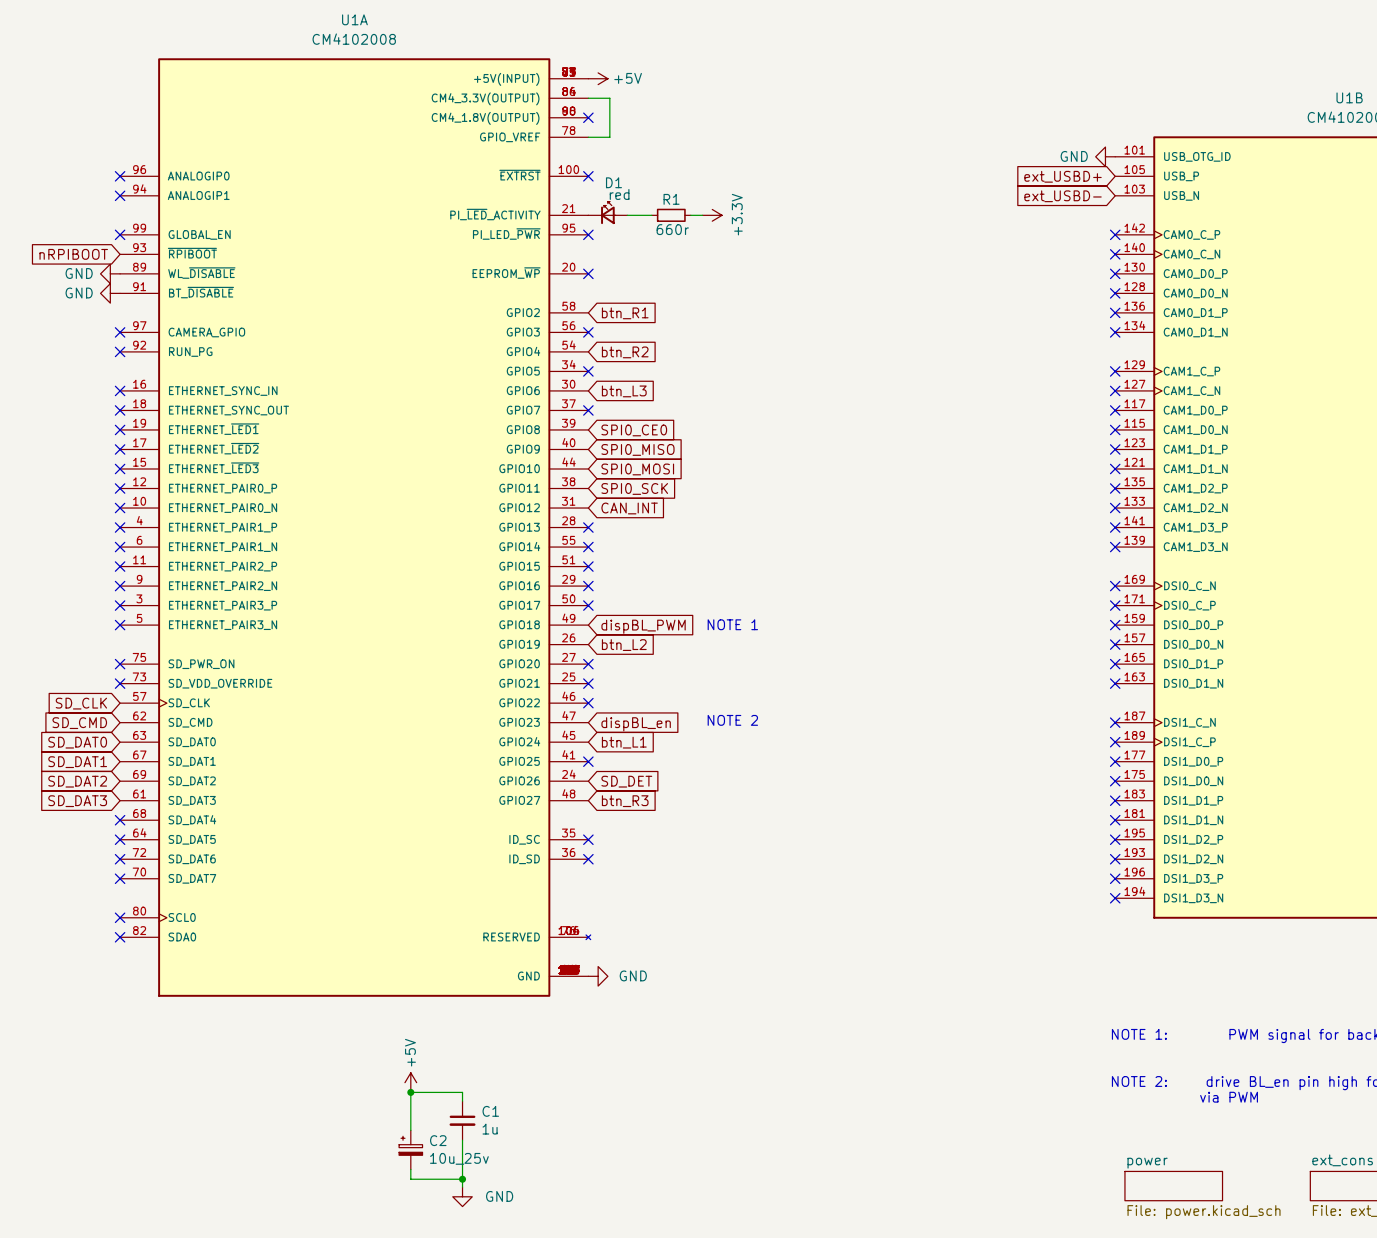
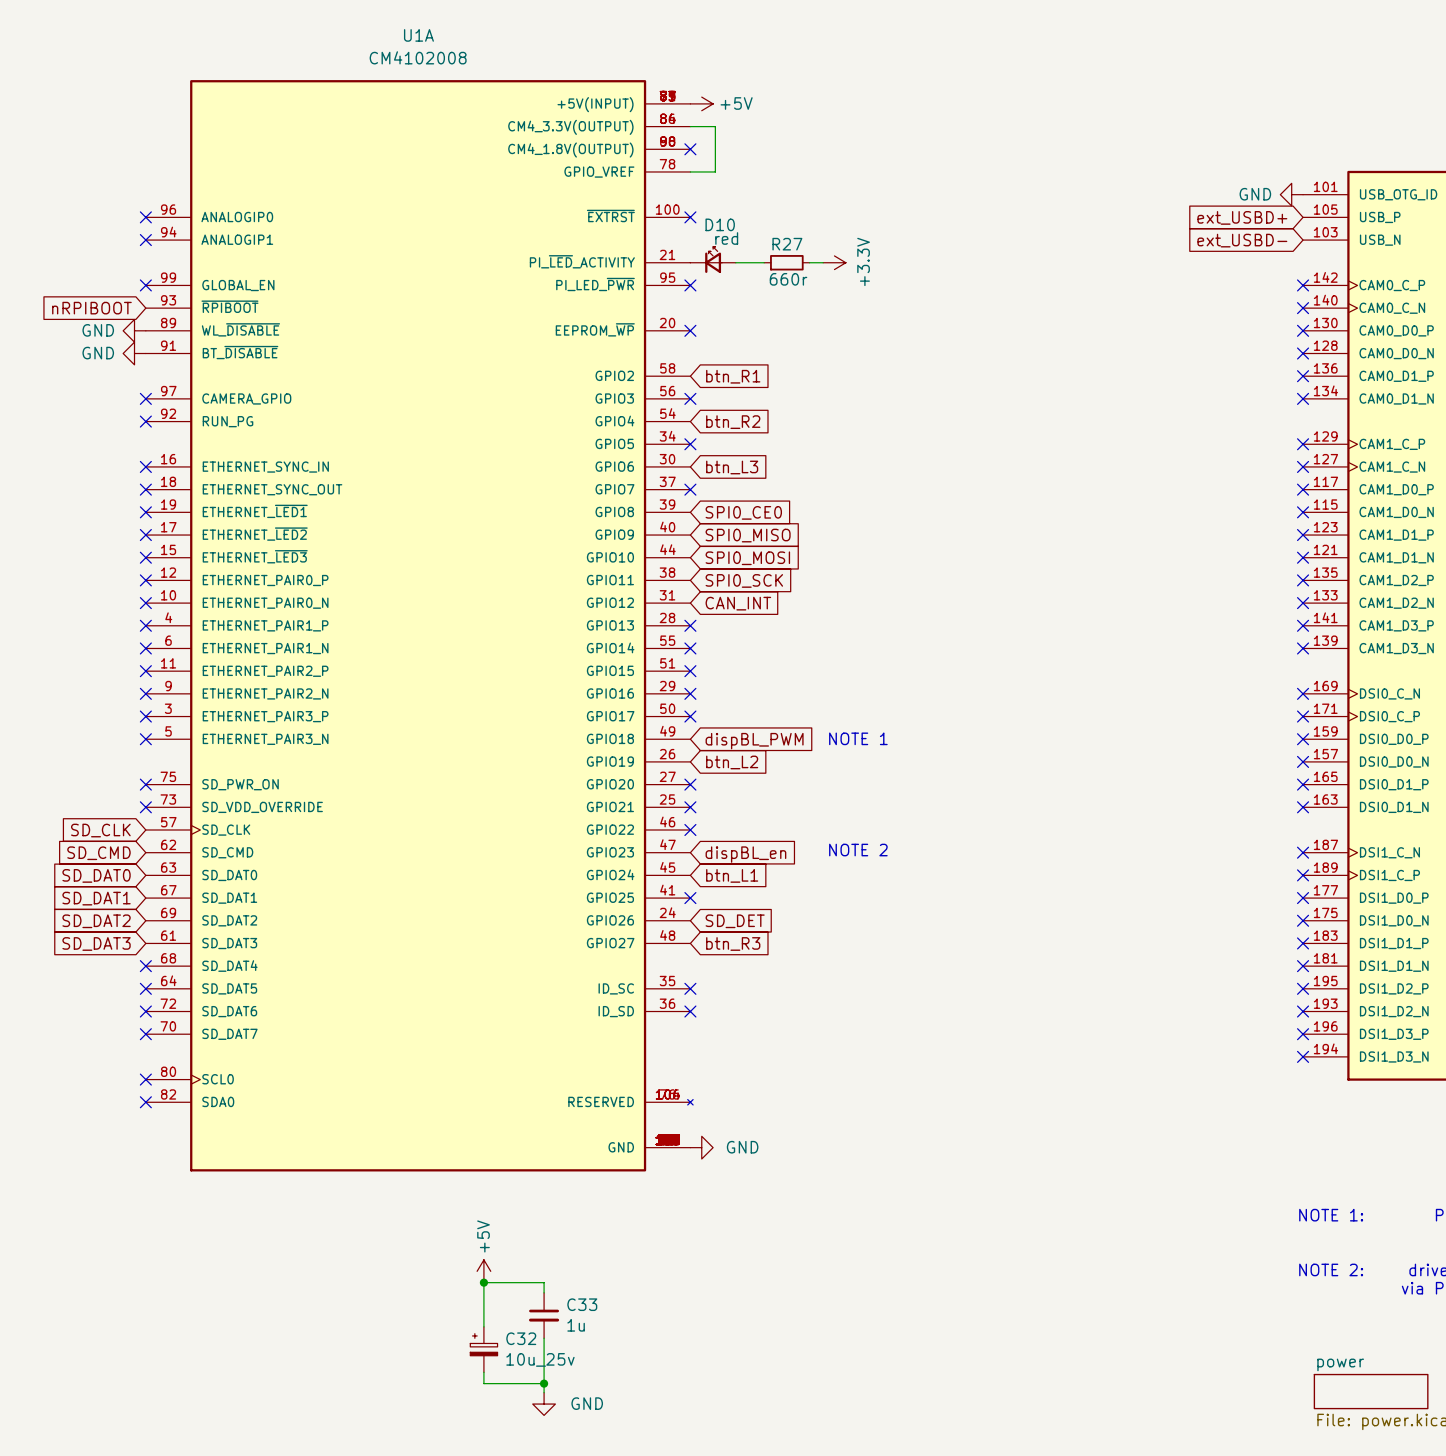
D1 name: D1 (613, 182) -> D10 (720, 224)
R1 name: R1 (671, 199) -> R27 (787, 244)
C1 name: C1 (490, 1111) -> C33 (582, 1304)
C2 name: C2 (438, 1140) -> C32 (521, 1338)

